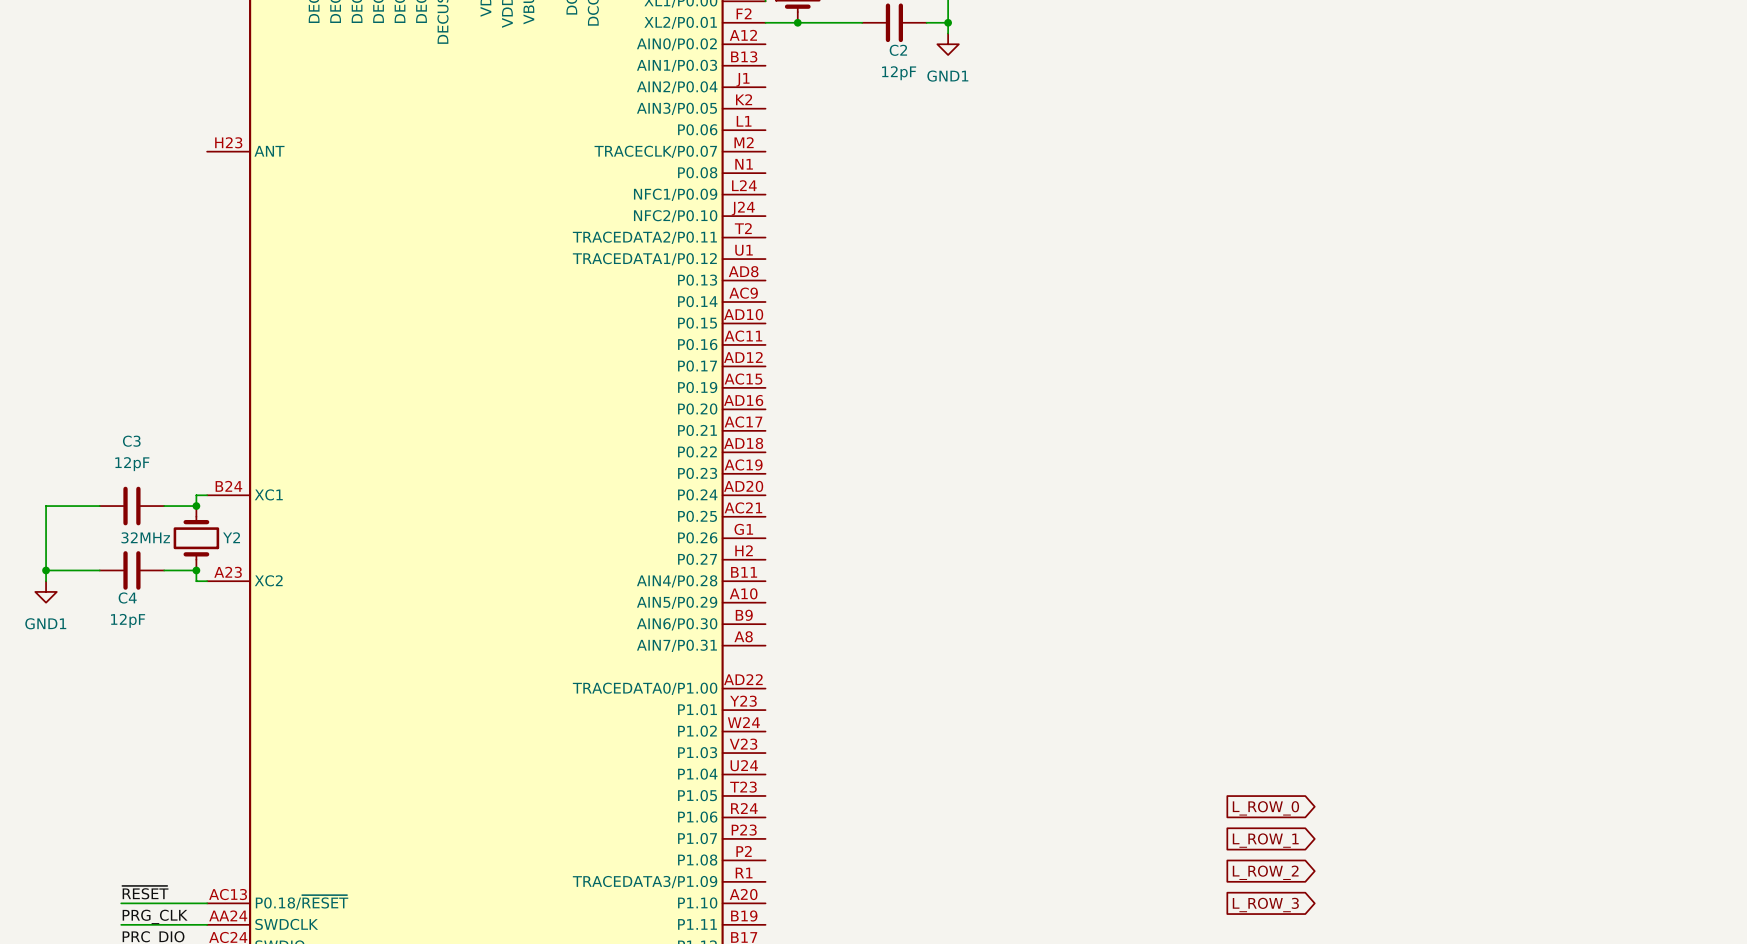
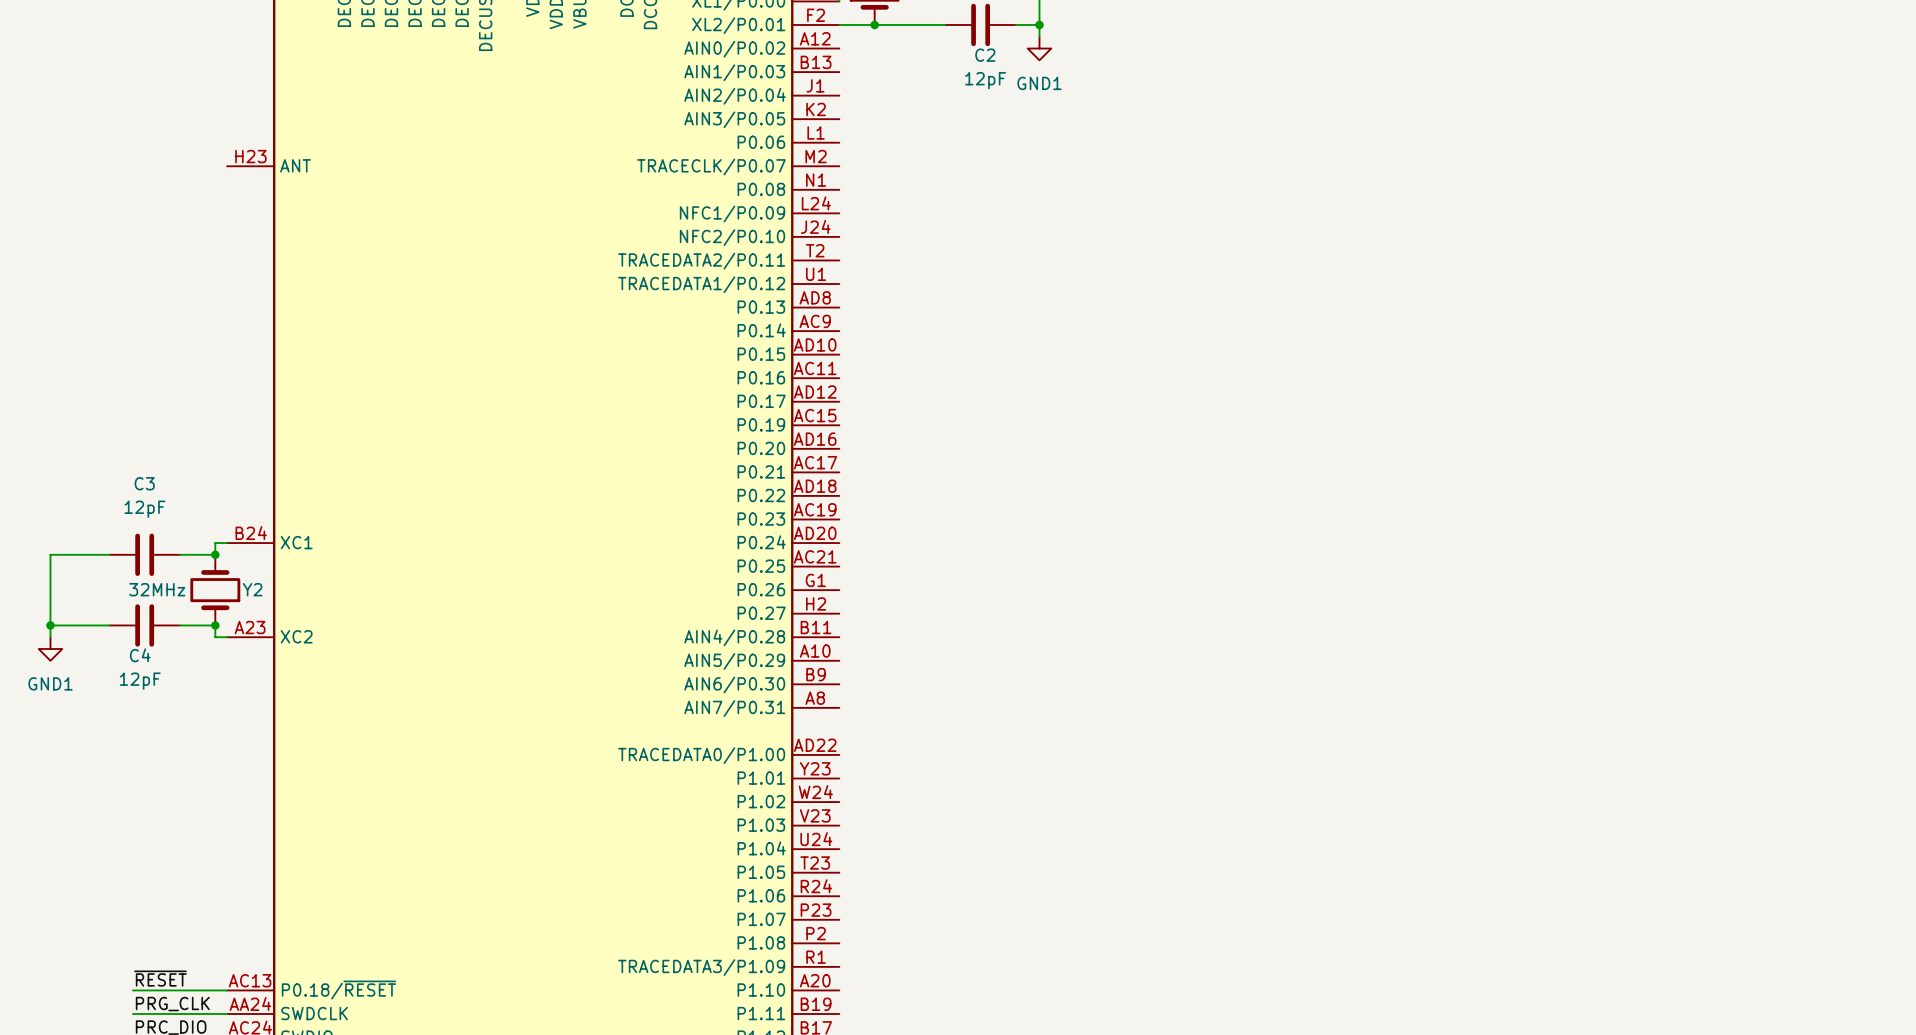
global label: L_ROW_0 (1265, 808) -> none
global label: L_ROW_1 (1265, 840) -> none
global label: L_ROW_2 (1265, 872) -> none
global label: L_ROW_3 (1265, 905) -> none

